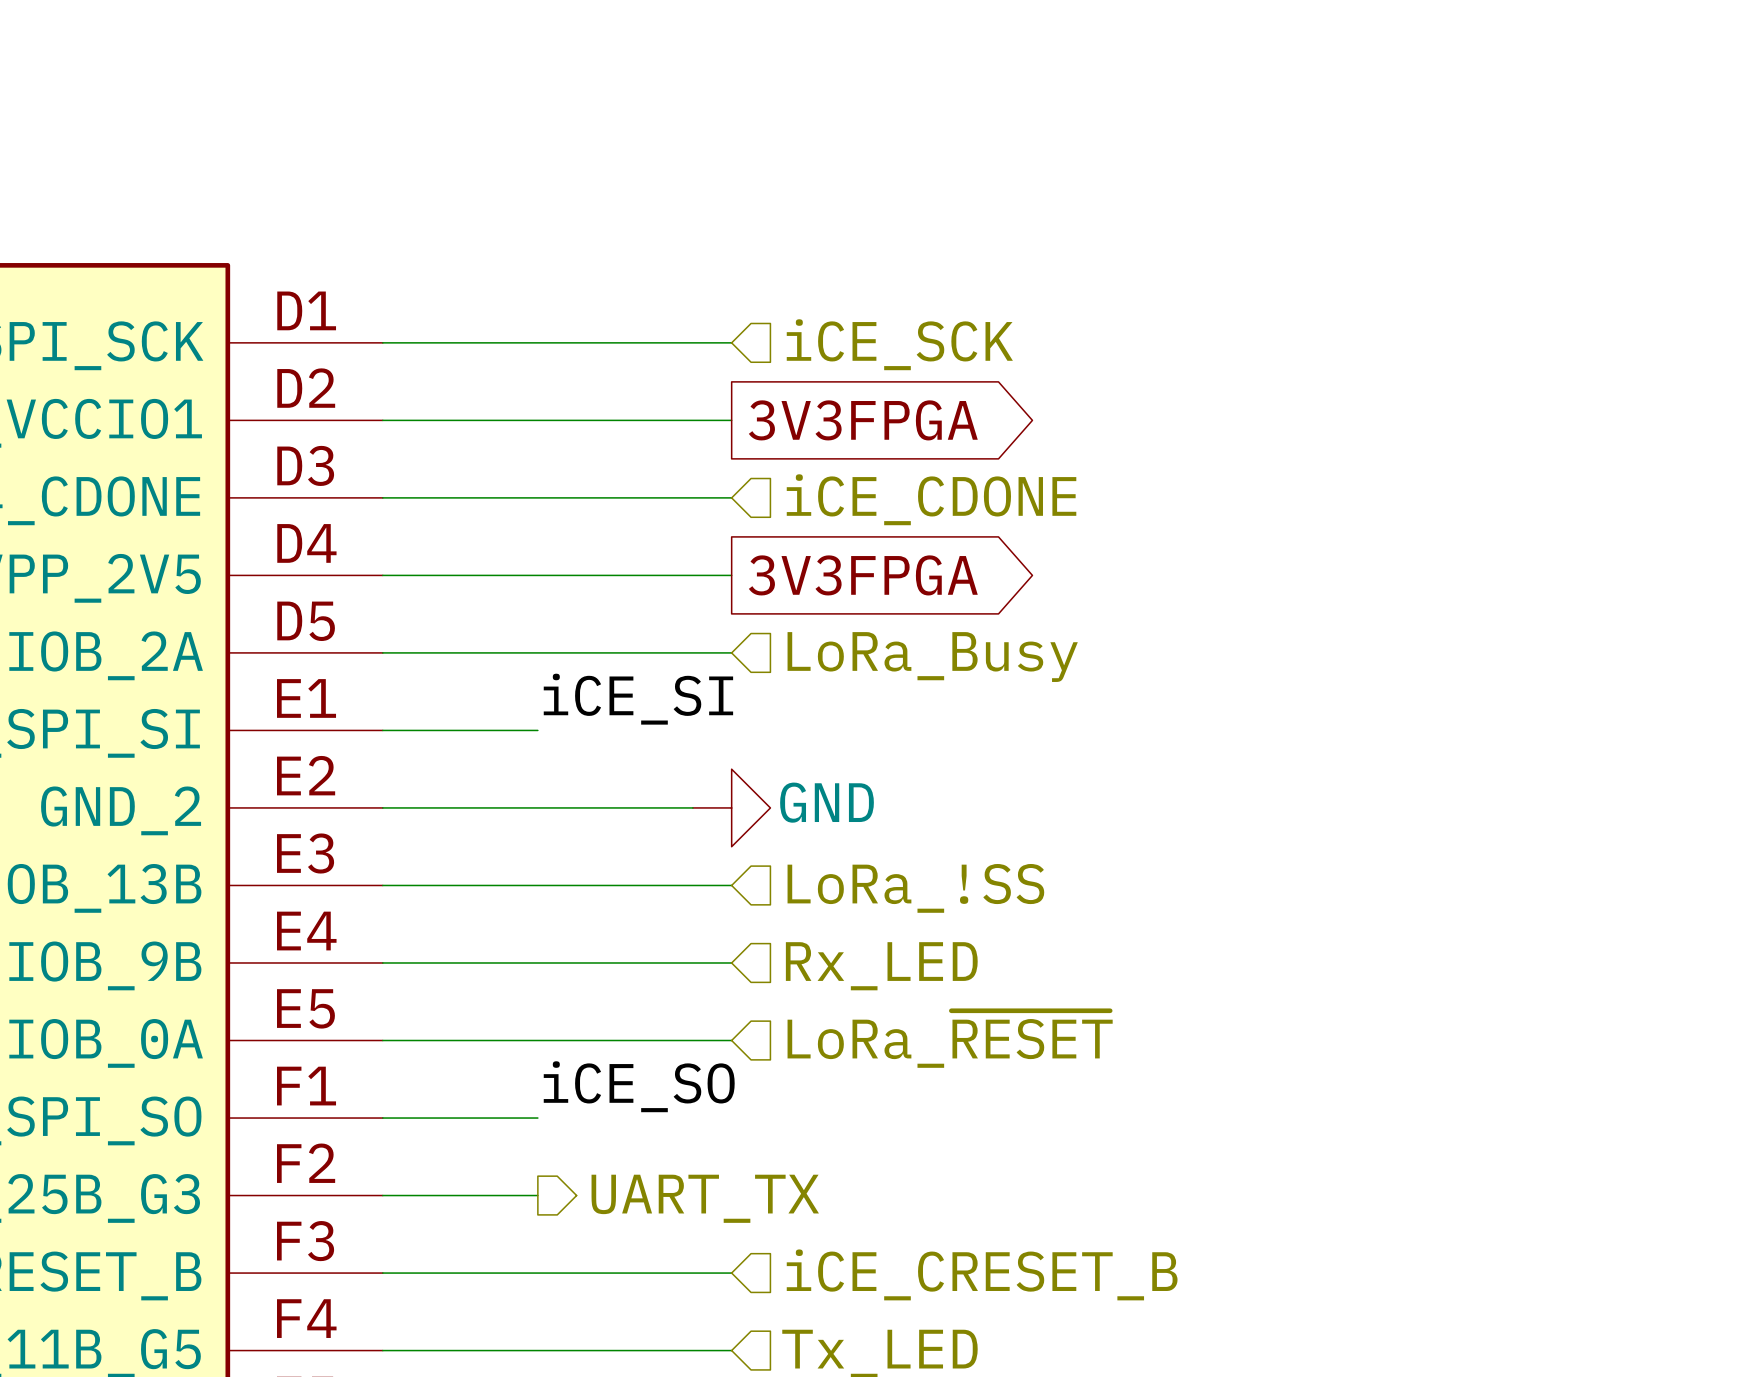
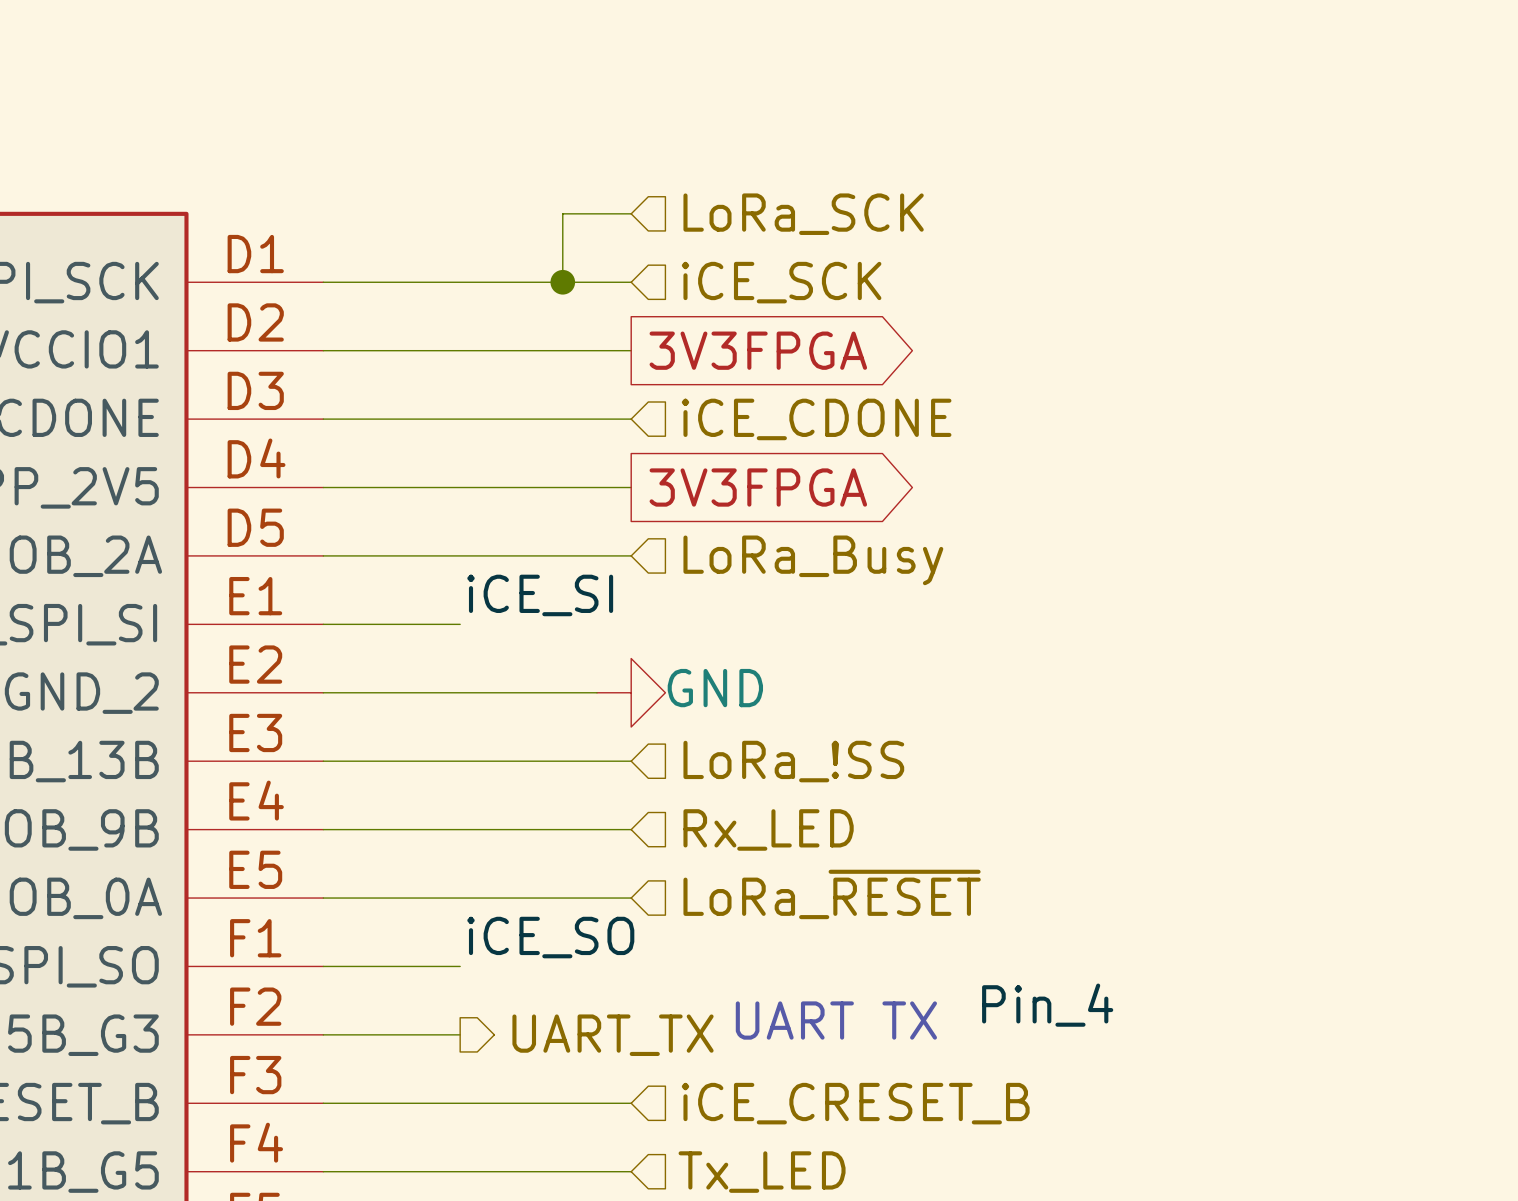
wire: none -> (631, 213) (562, 213) (562, 282)
hierarchical label: none -> LoRa_SCK (803, 214)
junction: none -> (562, 282)
label: none -> Pin_4 (1047, 1005)
text: none -> UART TX (836, 1020)

